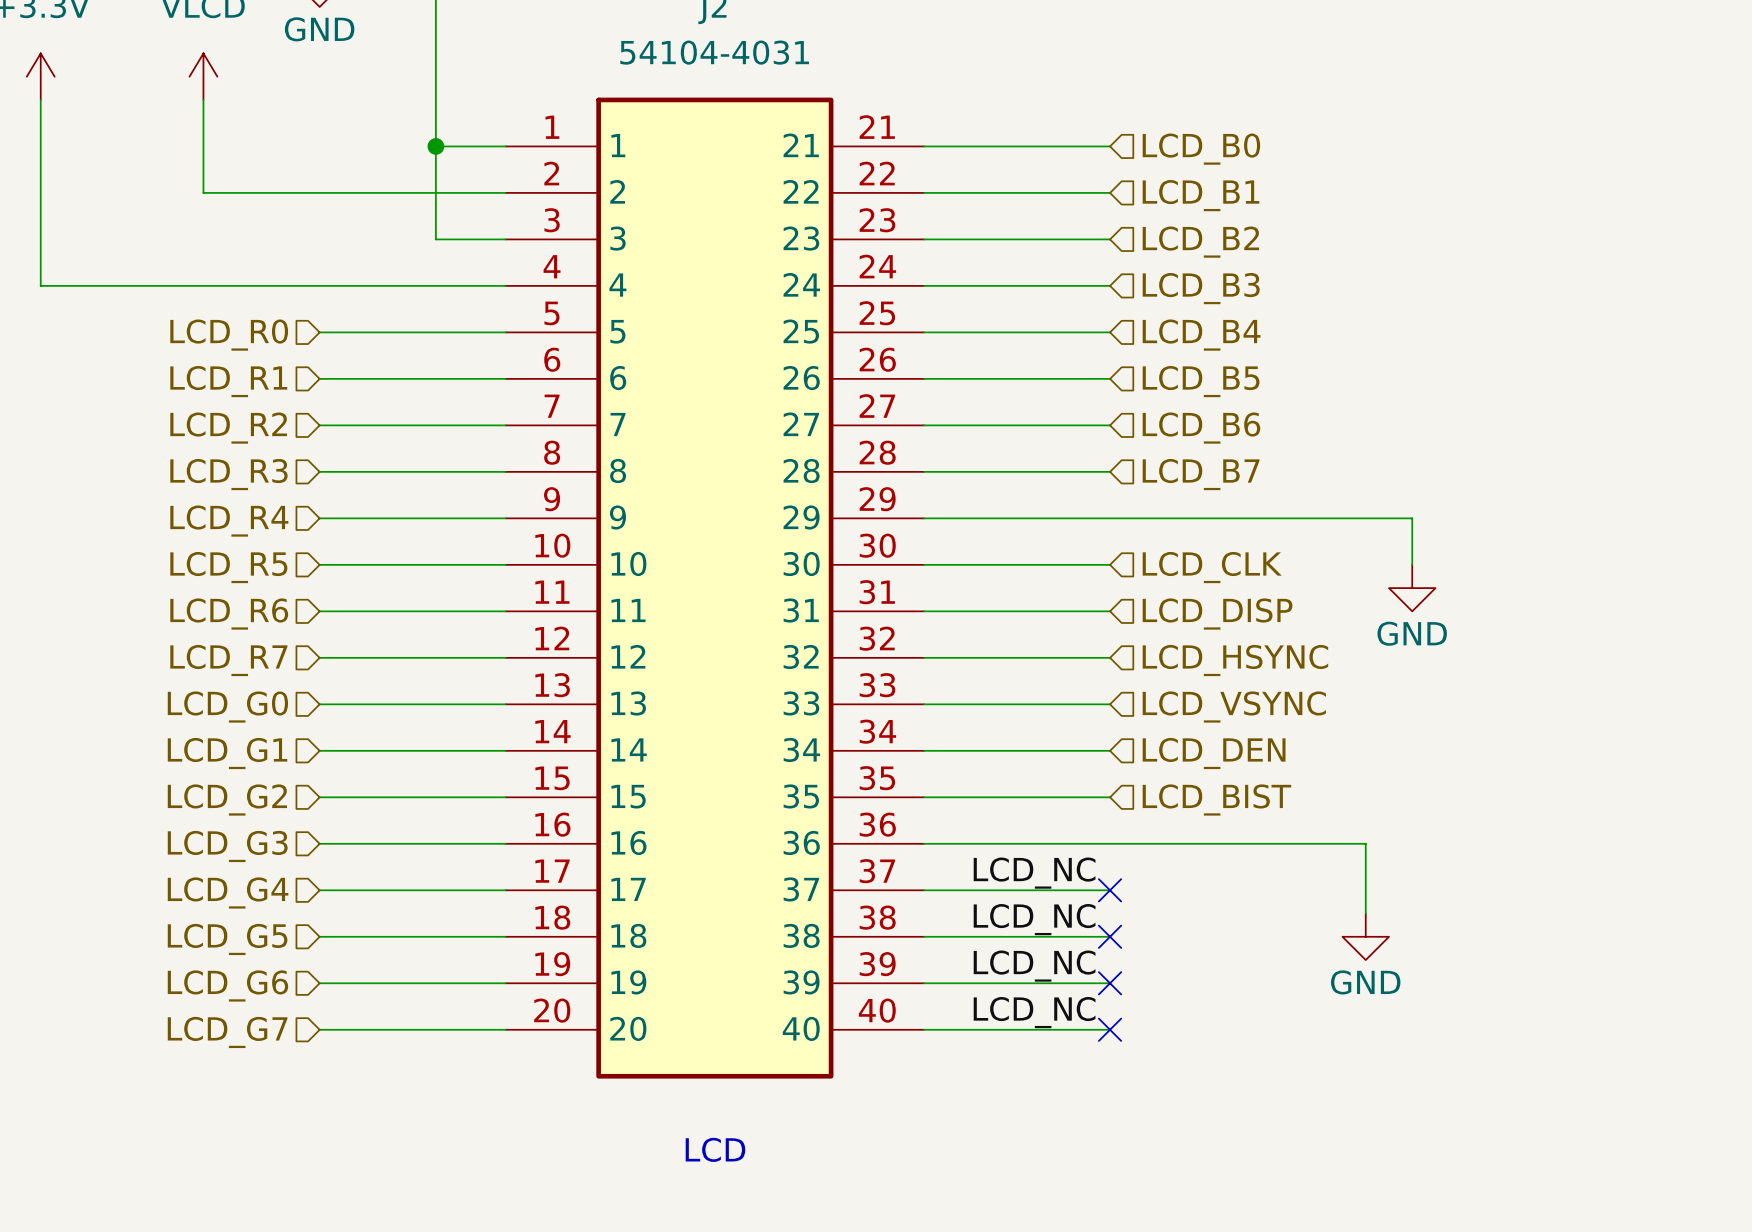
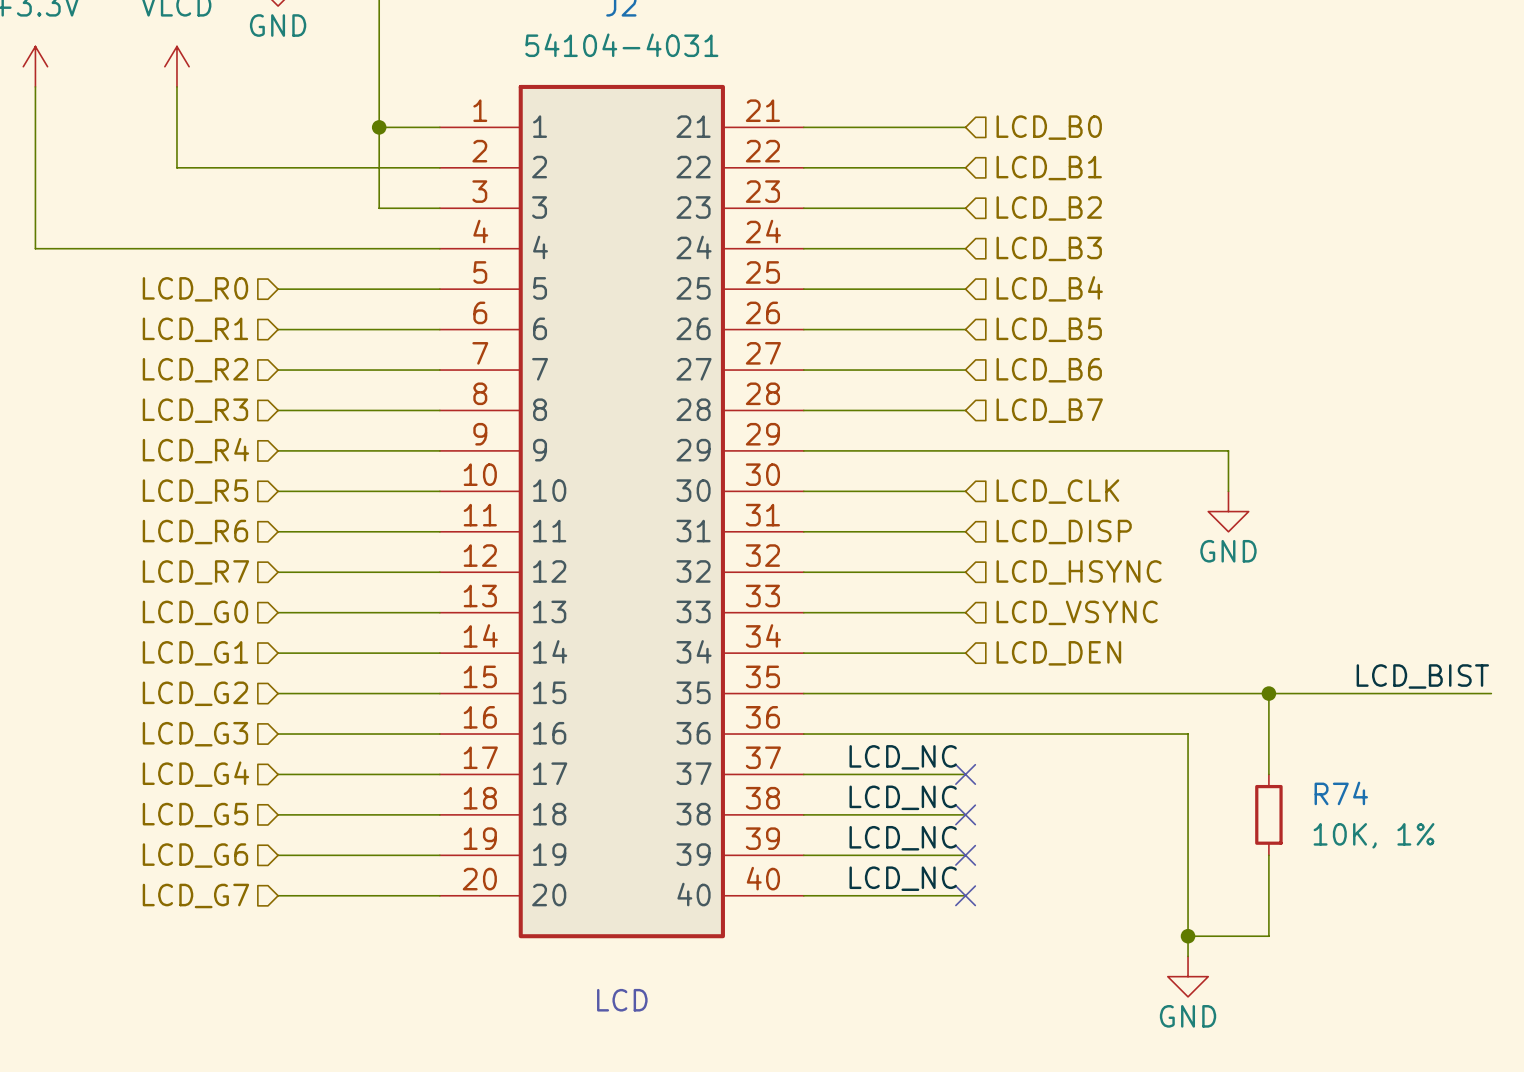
label: none -> LCD_BIST (1422, 676)
wire: none -> (965, 693) (1491, 693)
wire: none -> (1268, 693) (1268, 774)
junction: none -> (1268, 693)
hierarchical label: LCD_BIST (1216, 799) -> none
wire: none -> (1188, 794) (1188, 956)
power symbol position: GND (1365, 936) -> GND (1188, 976)
R74: none -> 10K, 1% (1268, 814)
wire: none -> (1268, 855) (1268, 936) (1188, 936)
junction: none -> (1188, 936)

